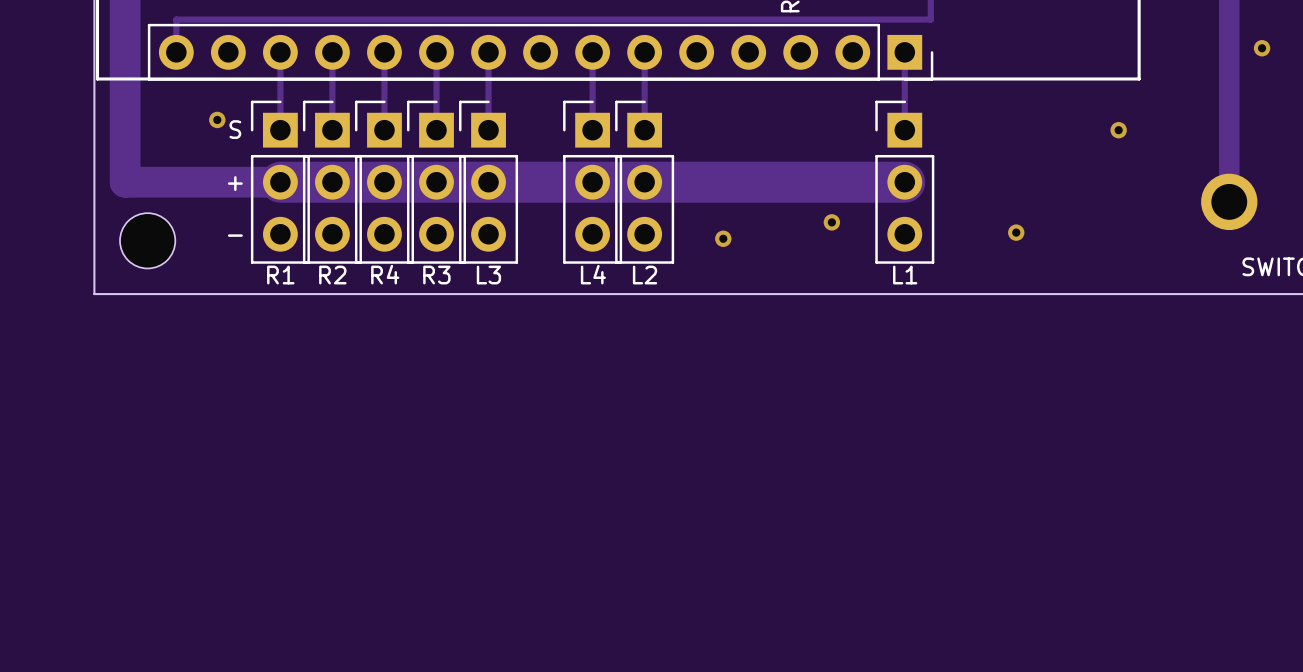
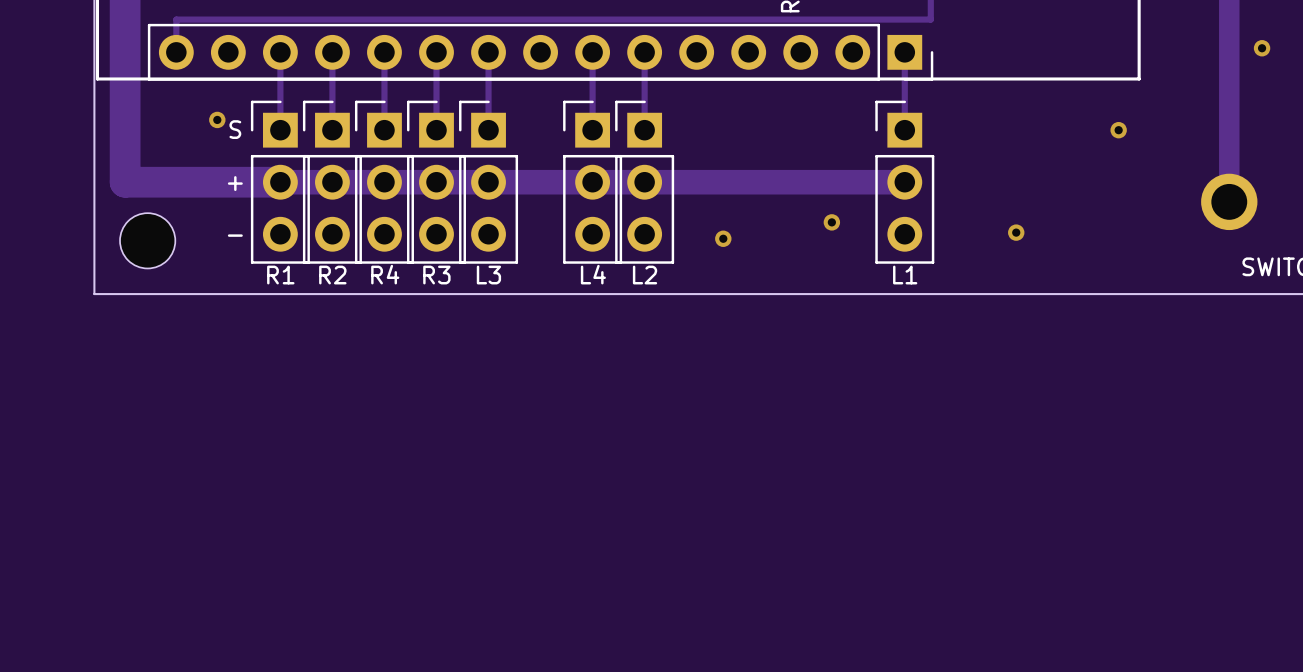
track width: thick (280, 182) (904, 182) -> thin (280, 182) (904, 182)

